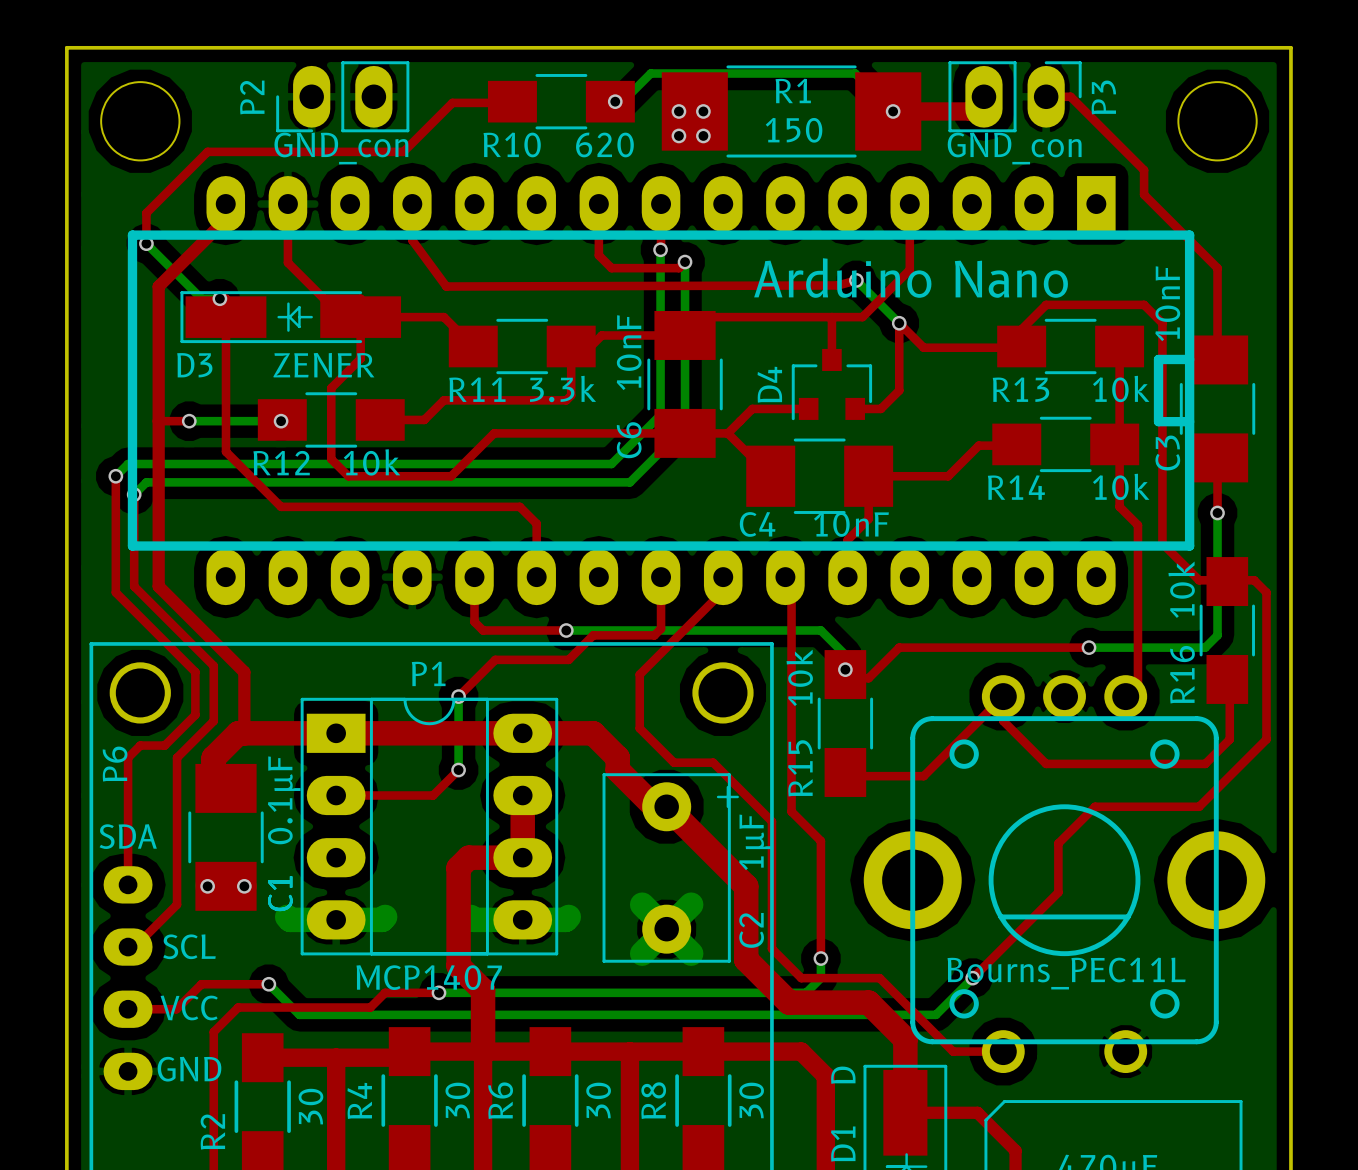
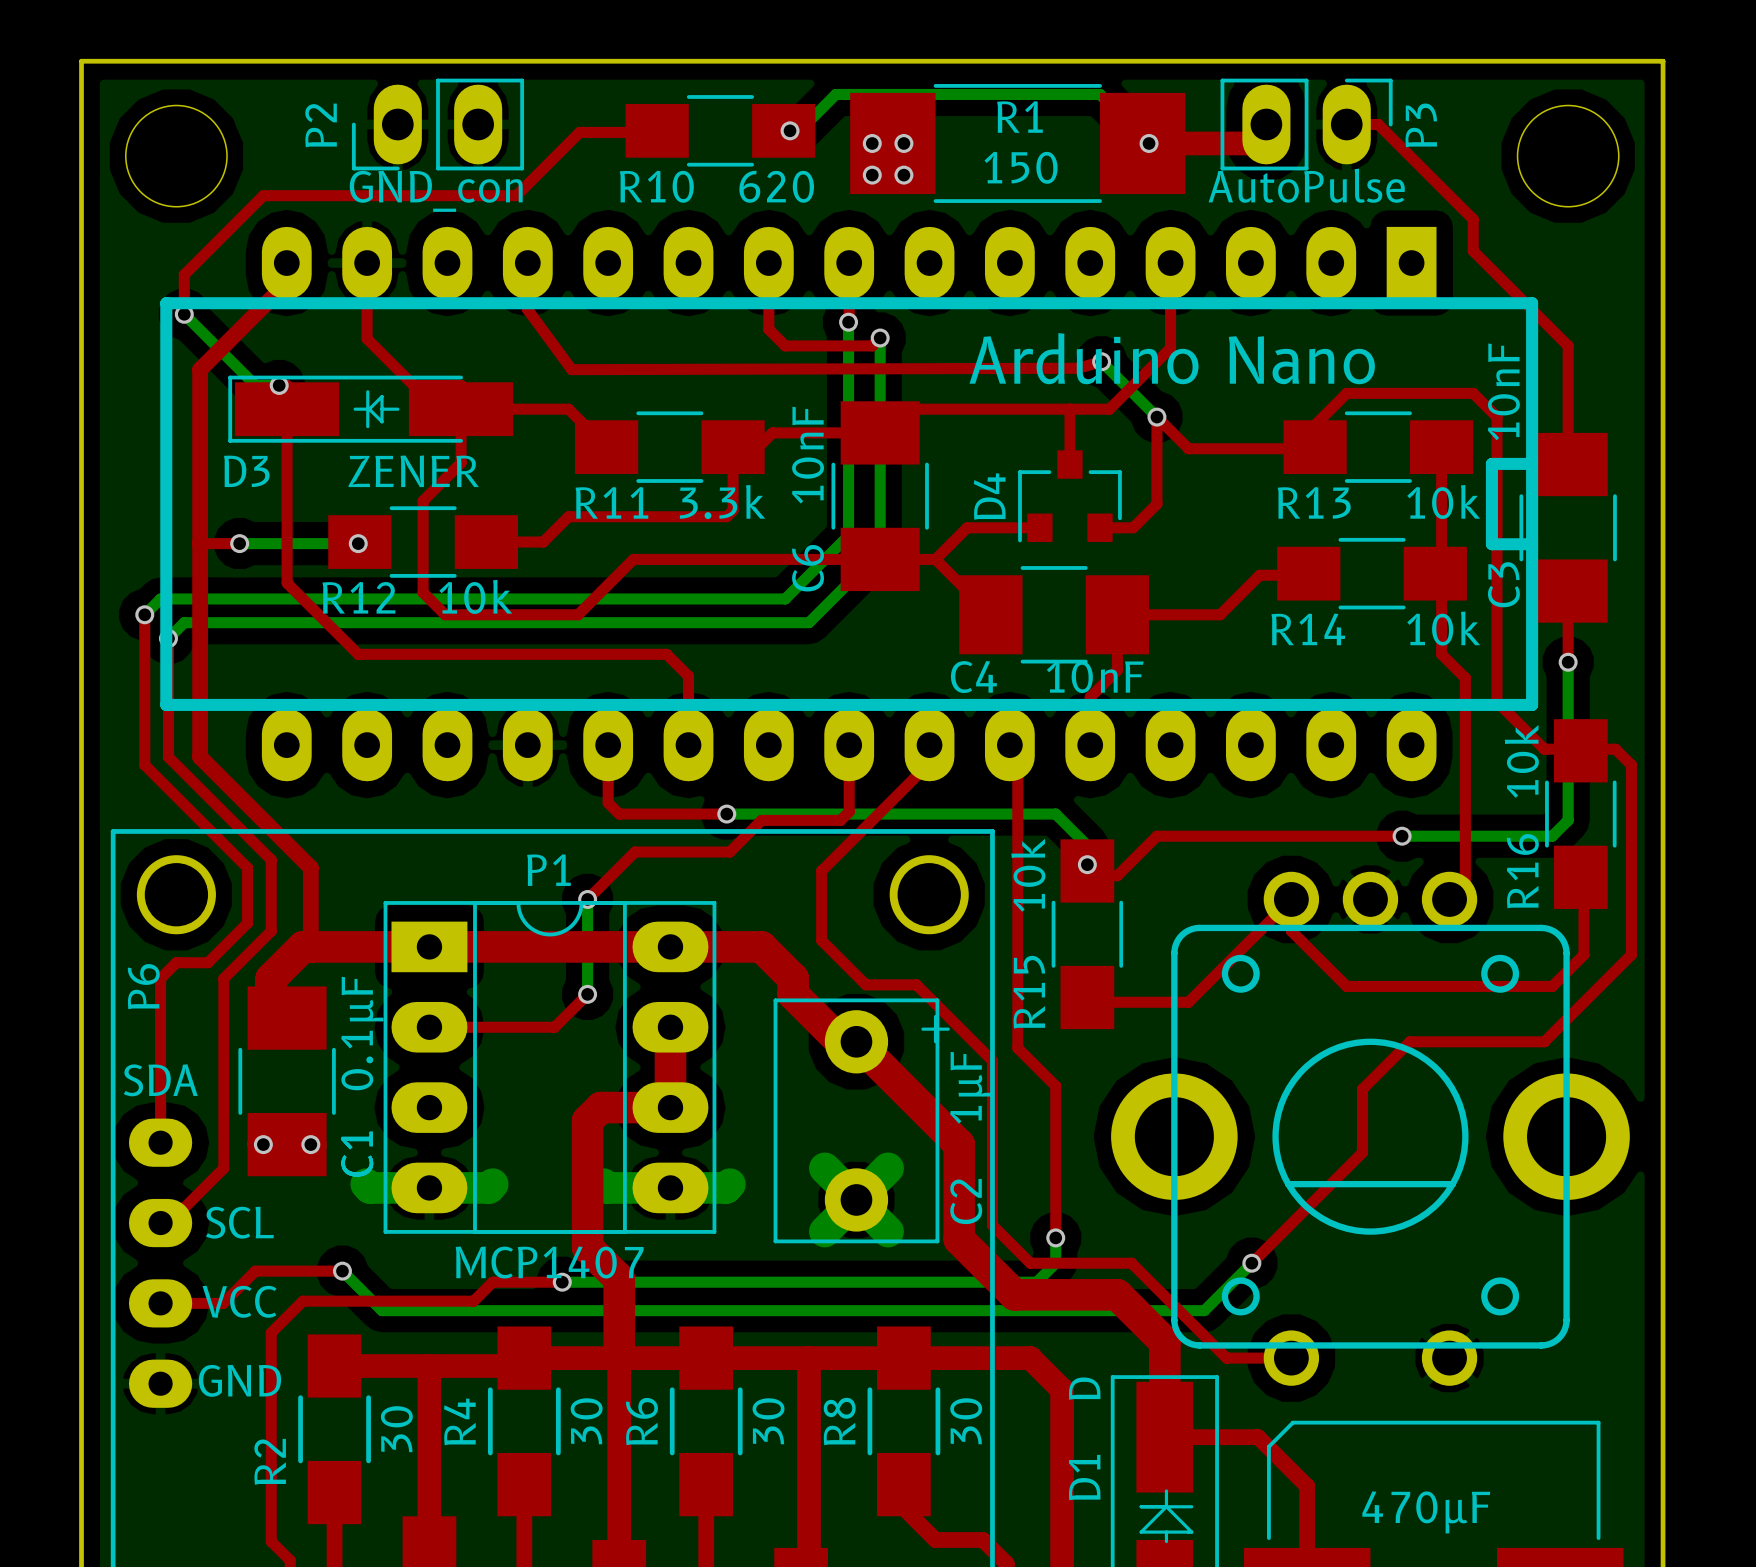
P3 value: GND_con (1014, 148) -> AutoPulse (1306, 185)
part value: Bourns_PEC11L (1066, 973) -> none

